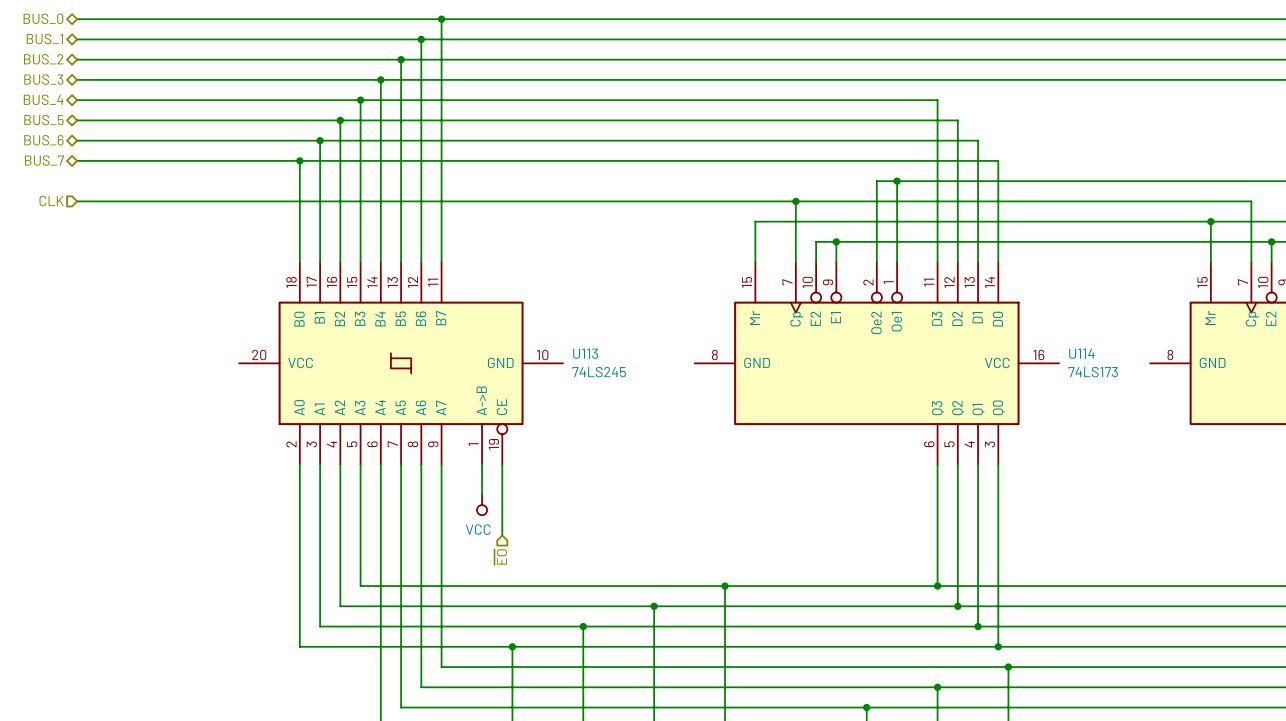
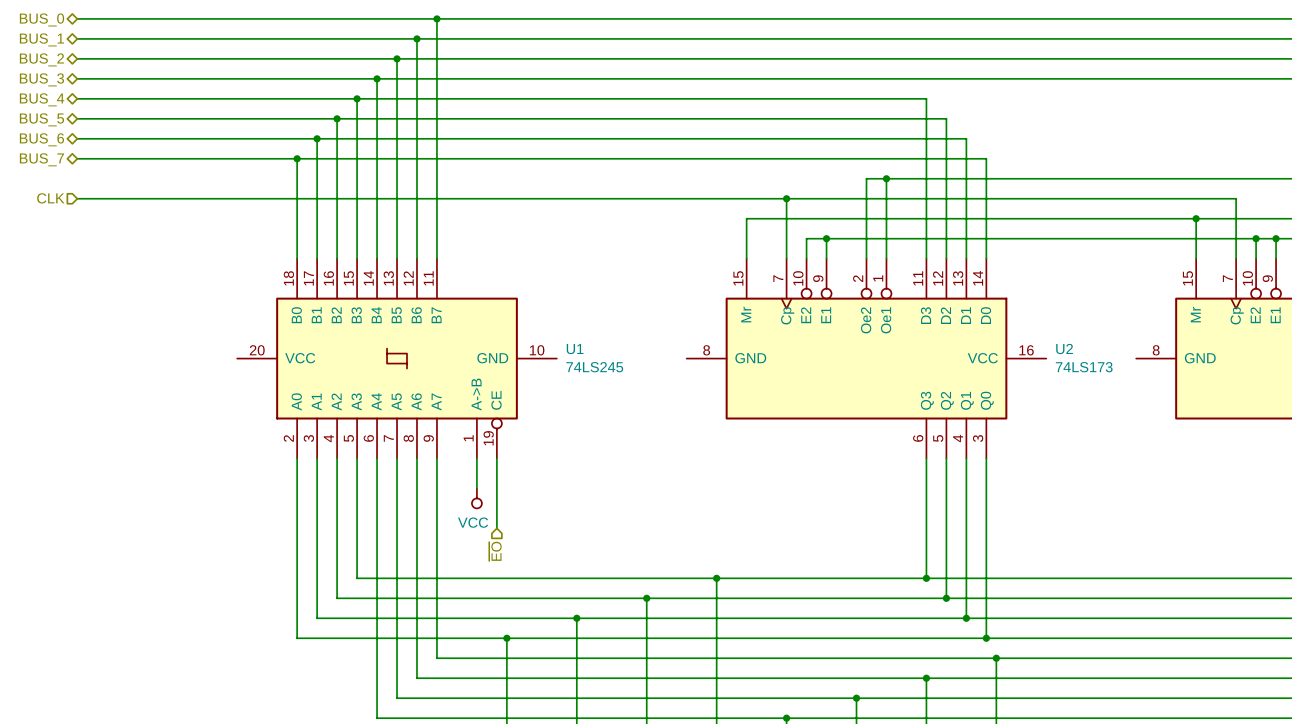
U113 name: U113 (585, 353) -> U1 (575, 349)
U114 name: U114 (1081, 353) -> U2 (1064, 349)

